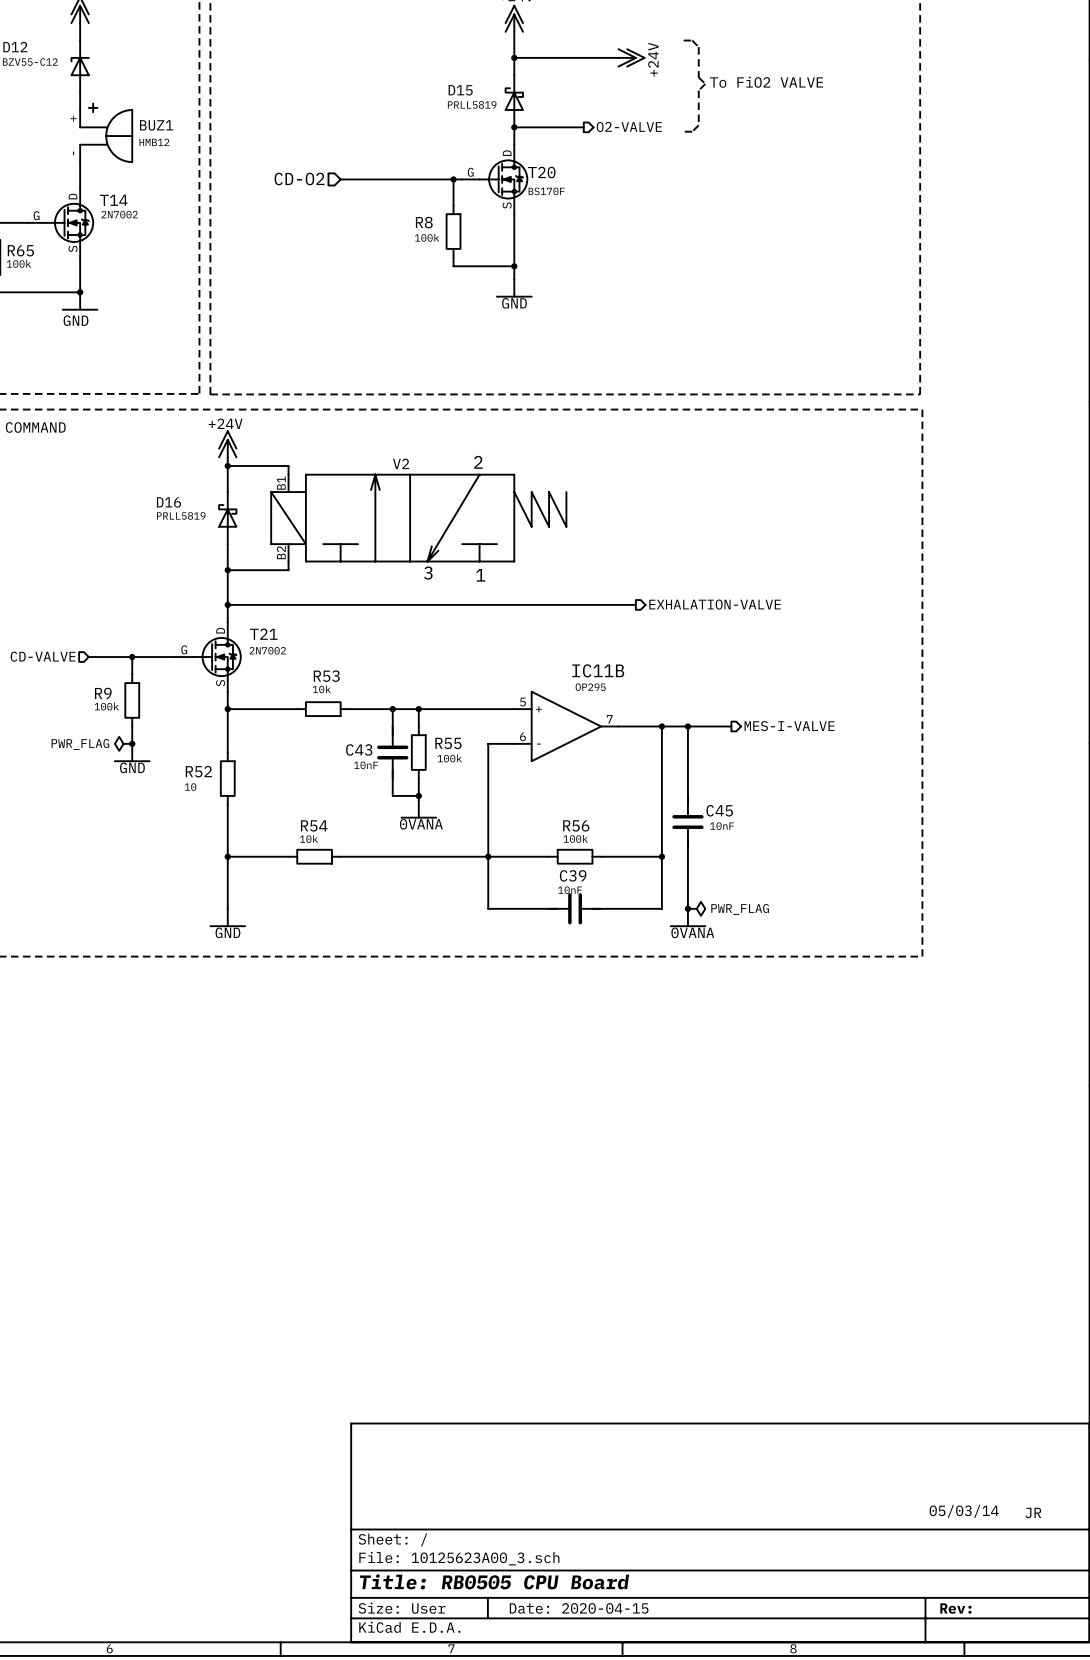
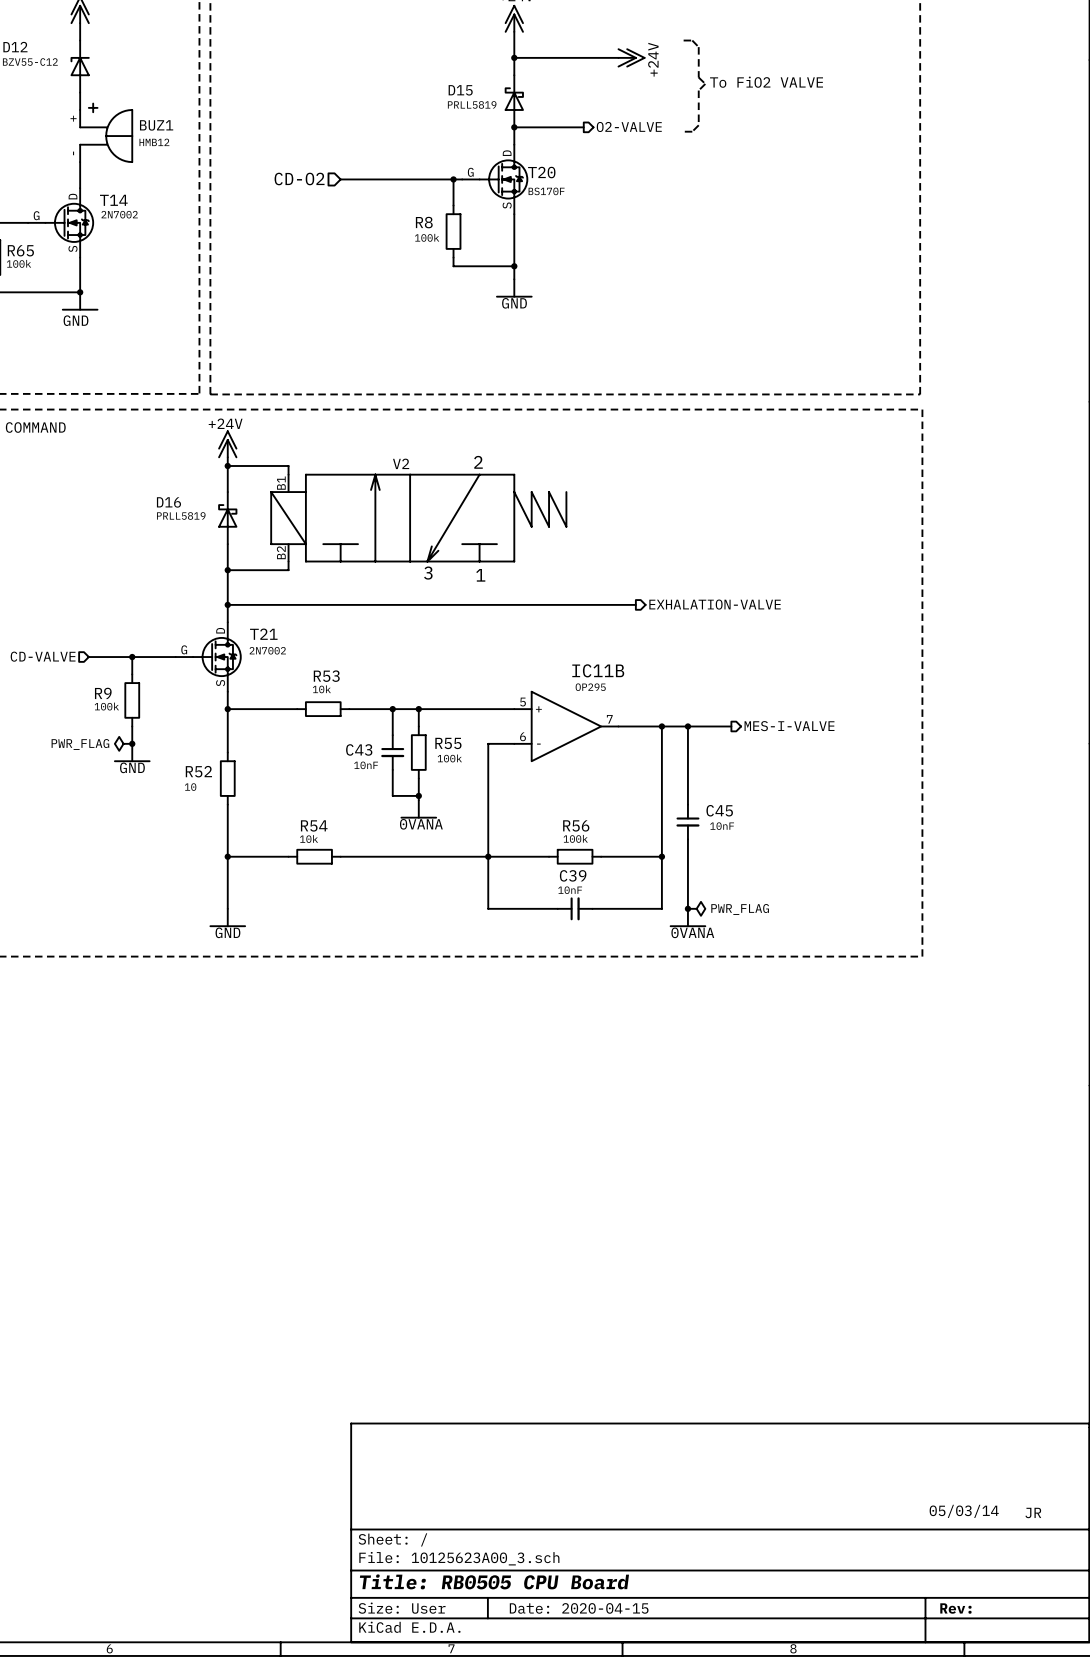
C43 symbol: [377, 726, 409, 779] -> [381, 735, 405, 770]
C45 symbol: [672, 795, 704, 849] -> [676, 804, 700, 840]
C39 symbol: [549, 893, 602, 925] -> [557, 897, 593, 921]

